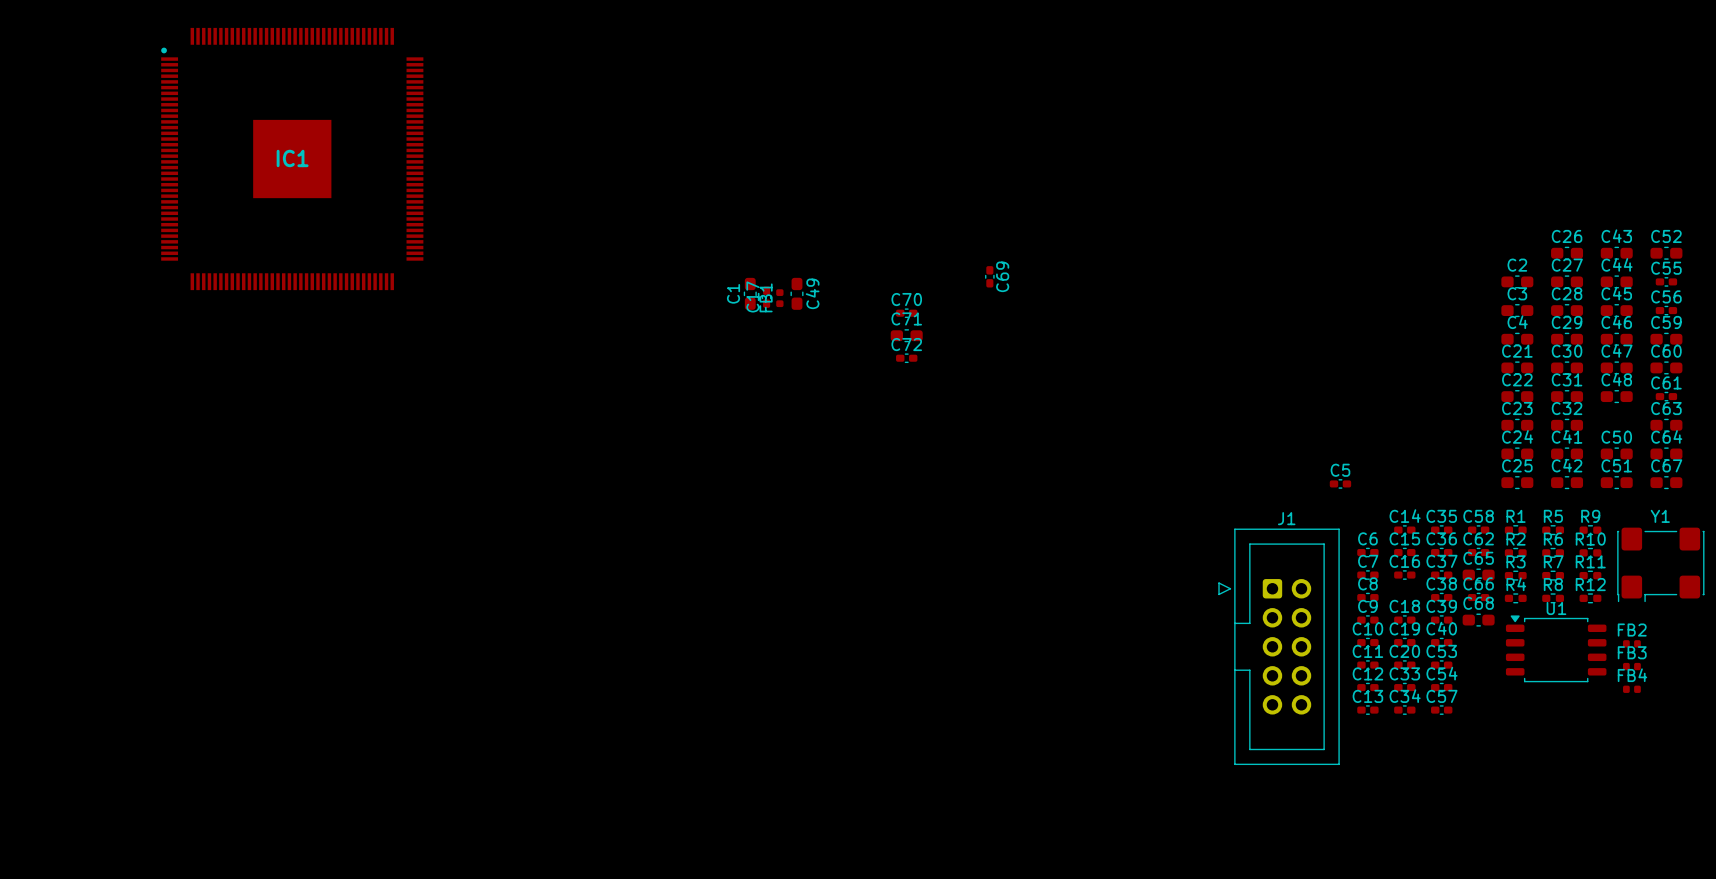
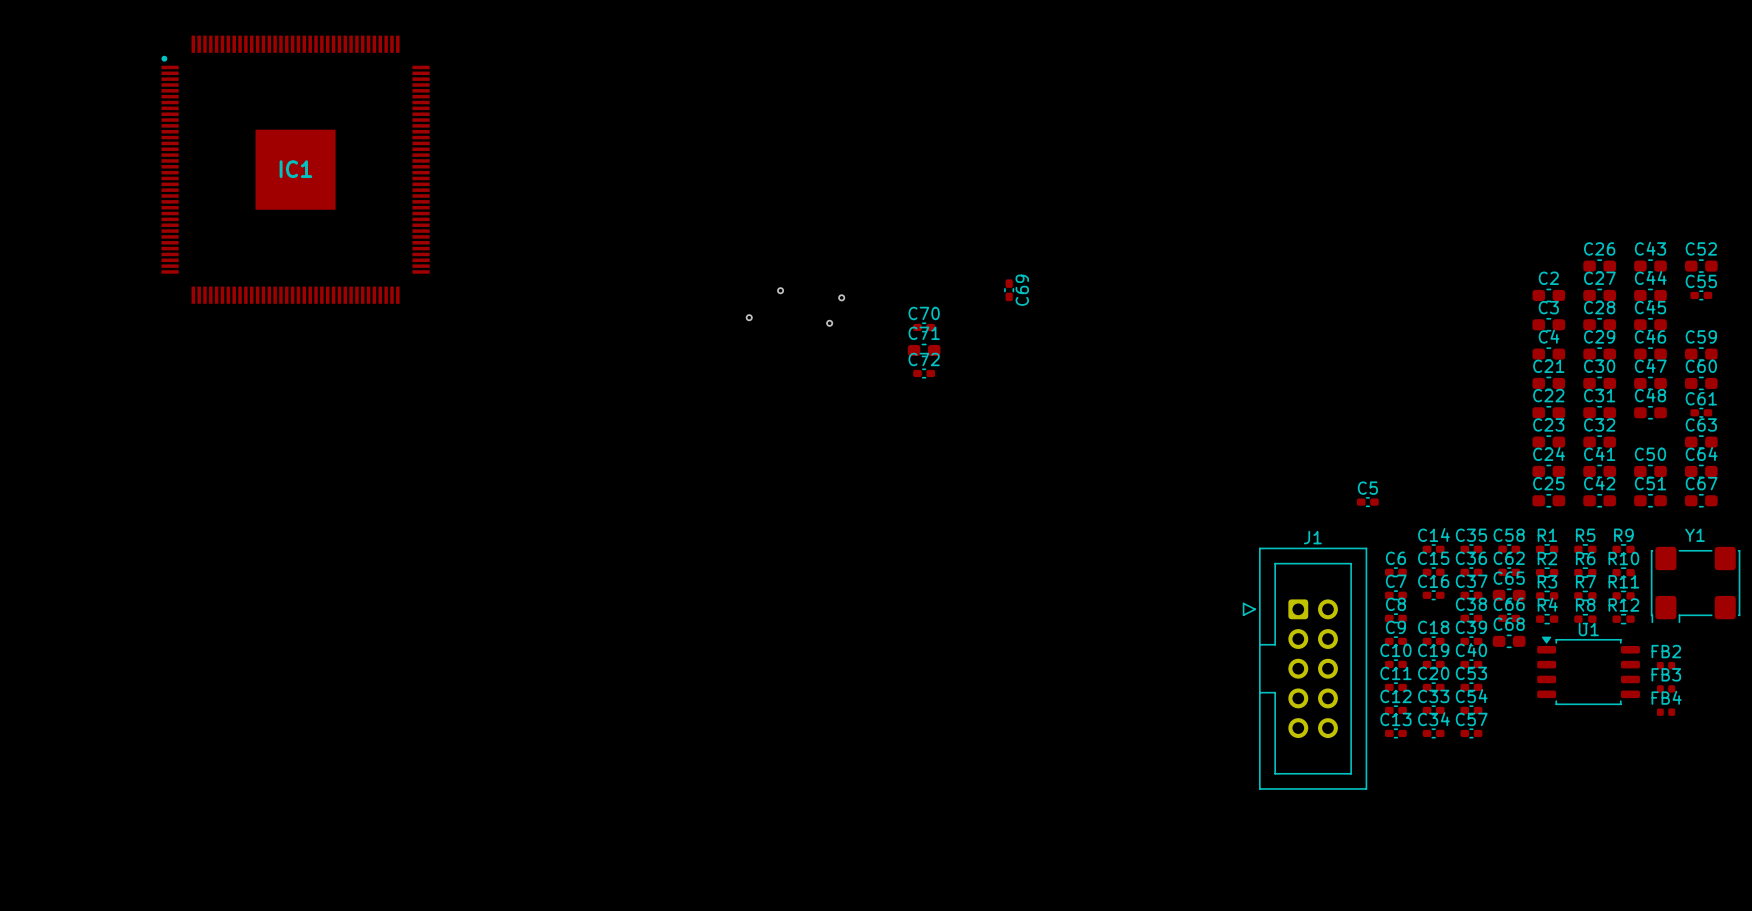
via: none -> (780, 290)
via: none -> (841, 297)
C1: (750, 293) -> none
C49: (796, 293) -> none
C17: (766, 297) -> none
FB1: (779, 298) -> none
via: none -> (749, 317)
via: none -> (829, 323)
C56: (1666, 310) -> none

